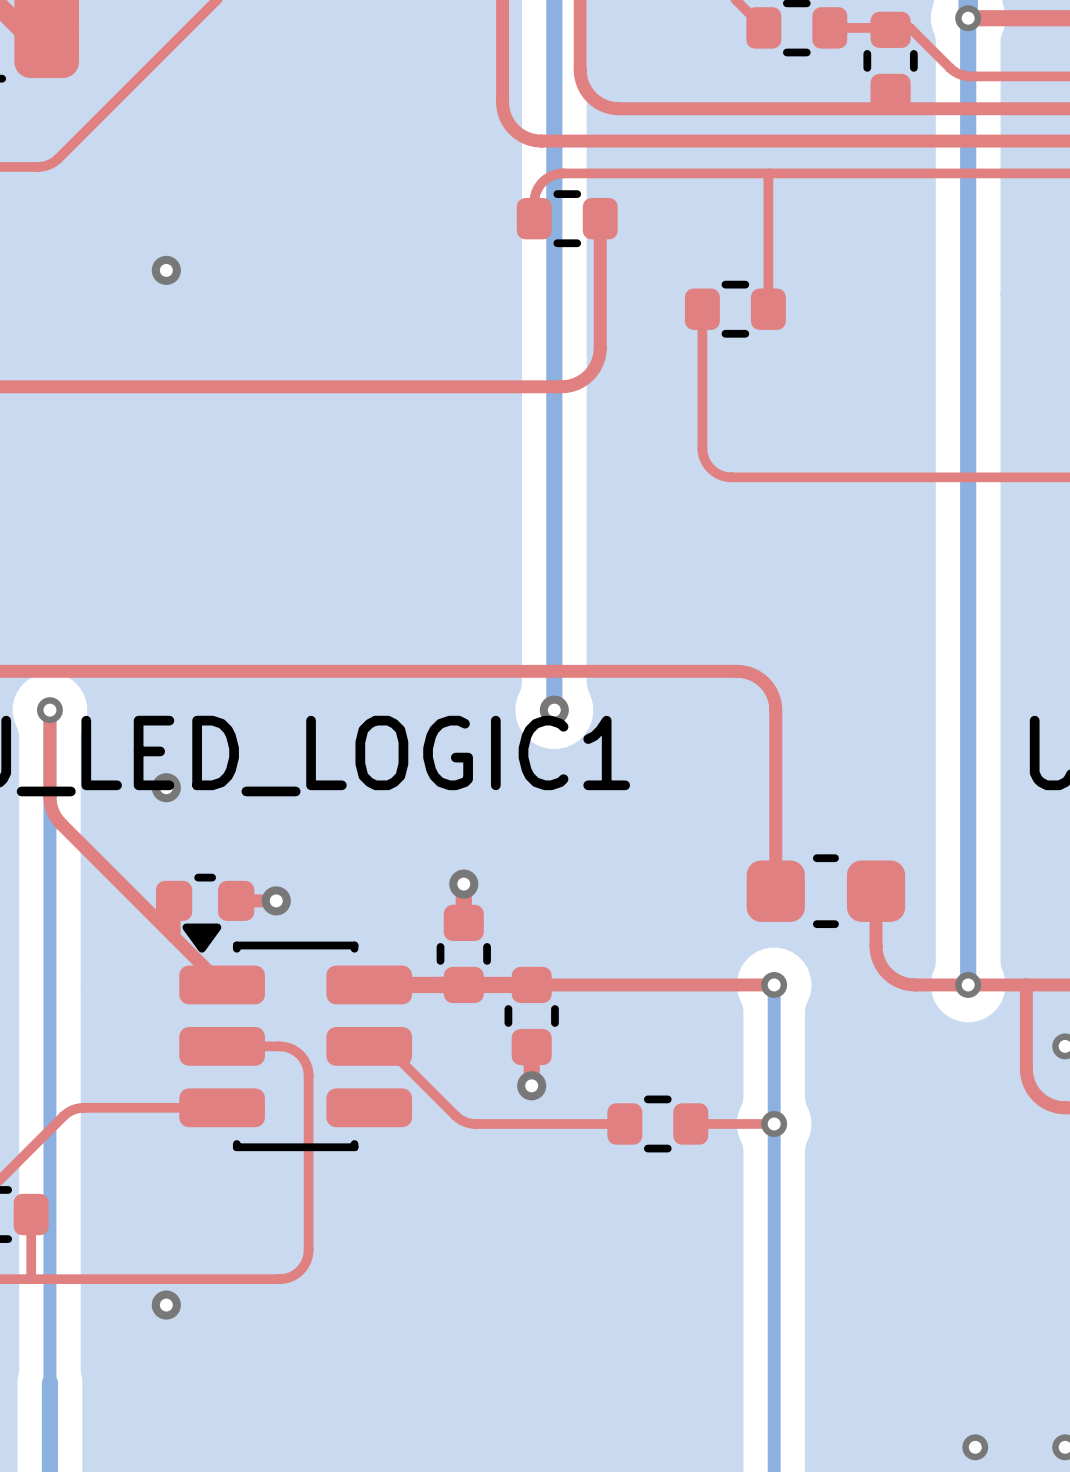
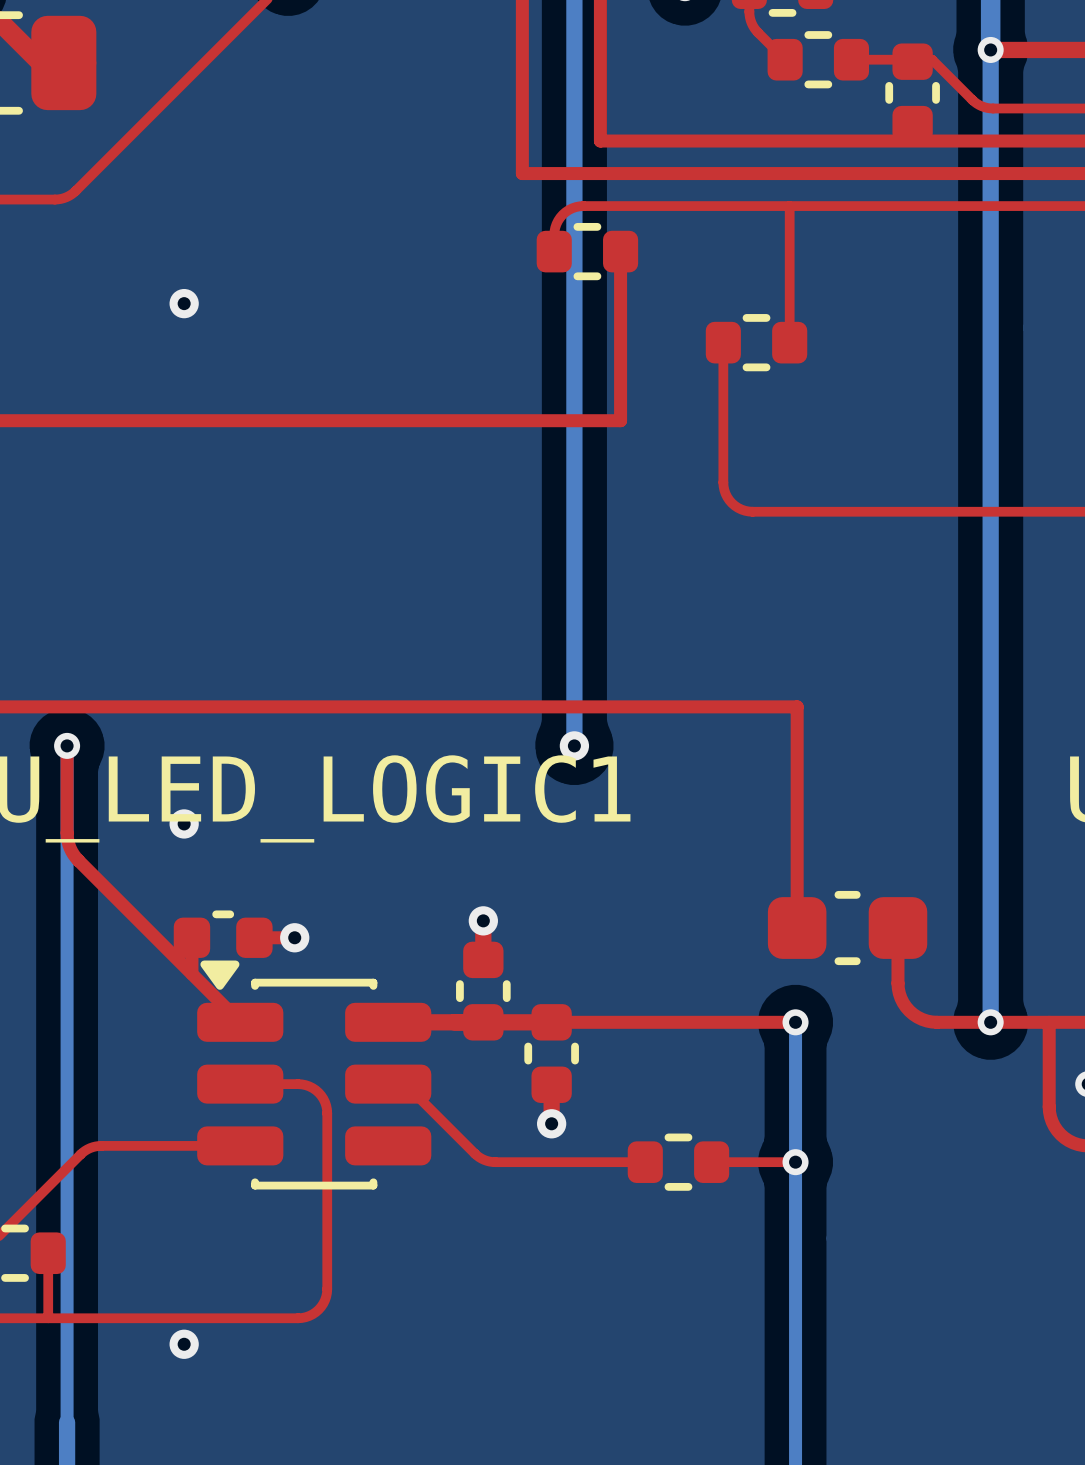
top track: (580, 69) (583, 84) (591, 97) (604, 105) (618, 108) -> (600, 102) (600, 141) (639, 141)
top track: (502, 102) (505, 117) (513, 129) (526, 138) (541, 141) -> (522, 134) (522, 173) (561, 173)
top track: (600, 348) (597, 362) (588, 375) (576, 383) (561, 386) -> (620, 381) (620, 420) (581, 420)
top track: (737, 671) (751, 674) (764, 682) (772, 695) (775, 710) -> (758, 706) (797, 706) (797, 745)

